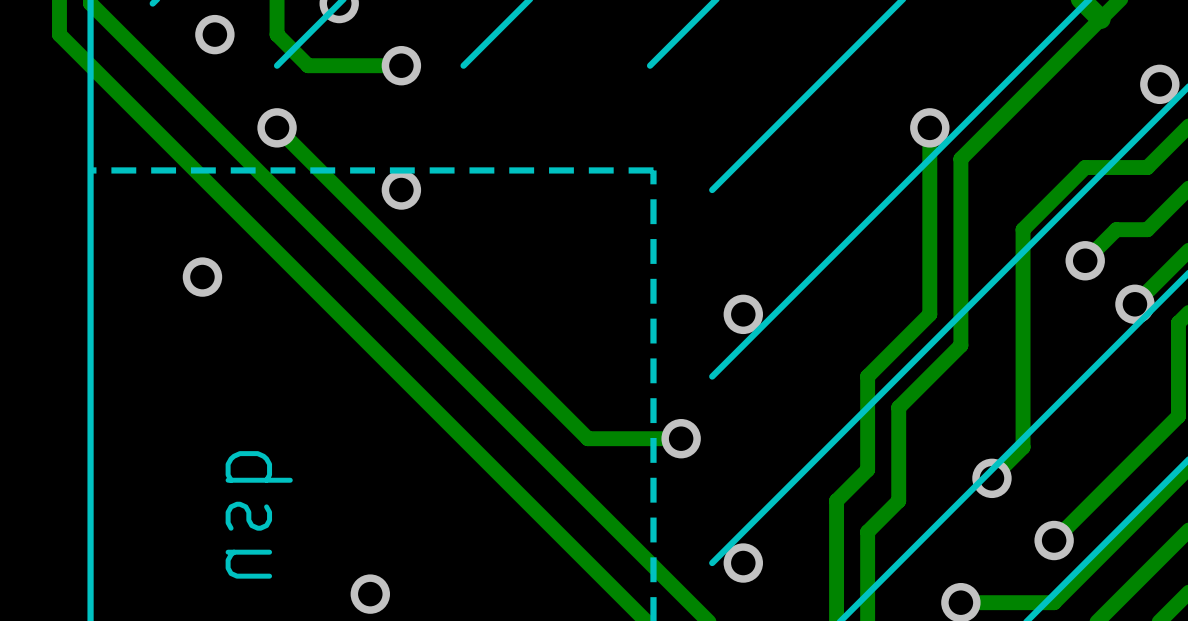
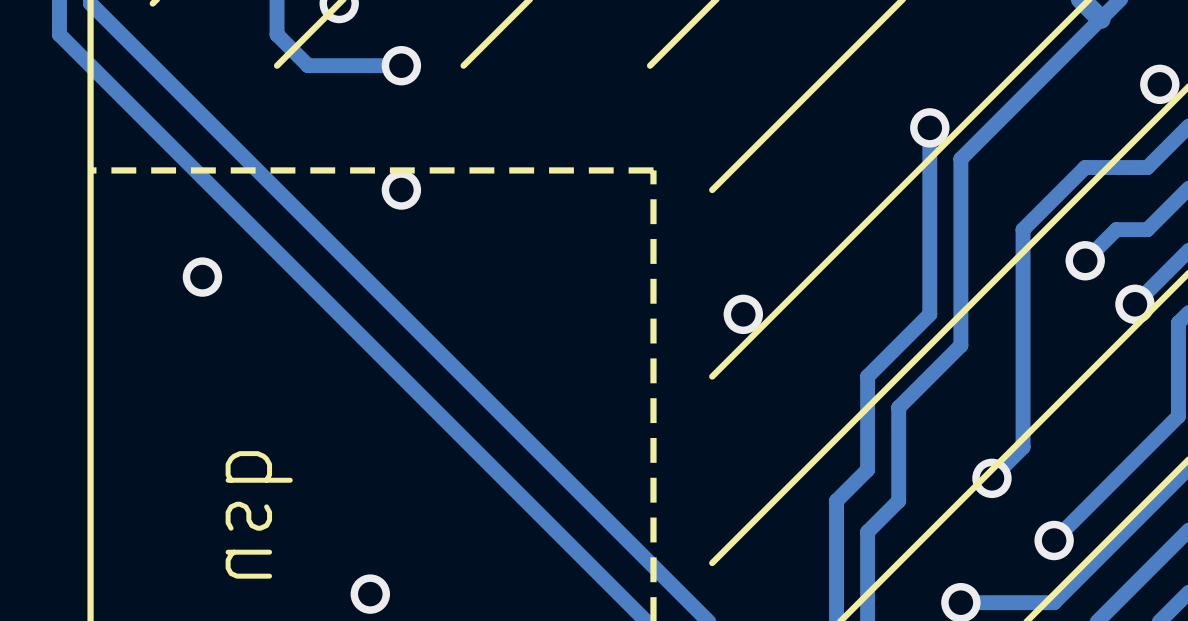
via: (214, 34) -> none
track: (277, 127) (587, 438) (681, 438) -> none
via: (277, 127) -> none
via: (681, 438) -> none
via: (743, 563) -> none

